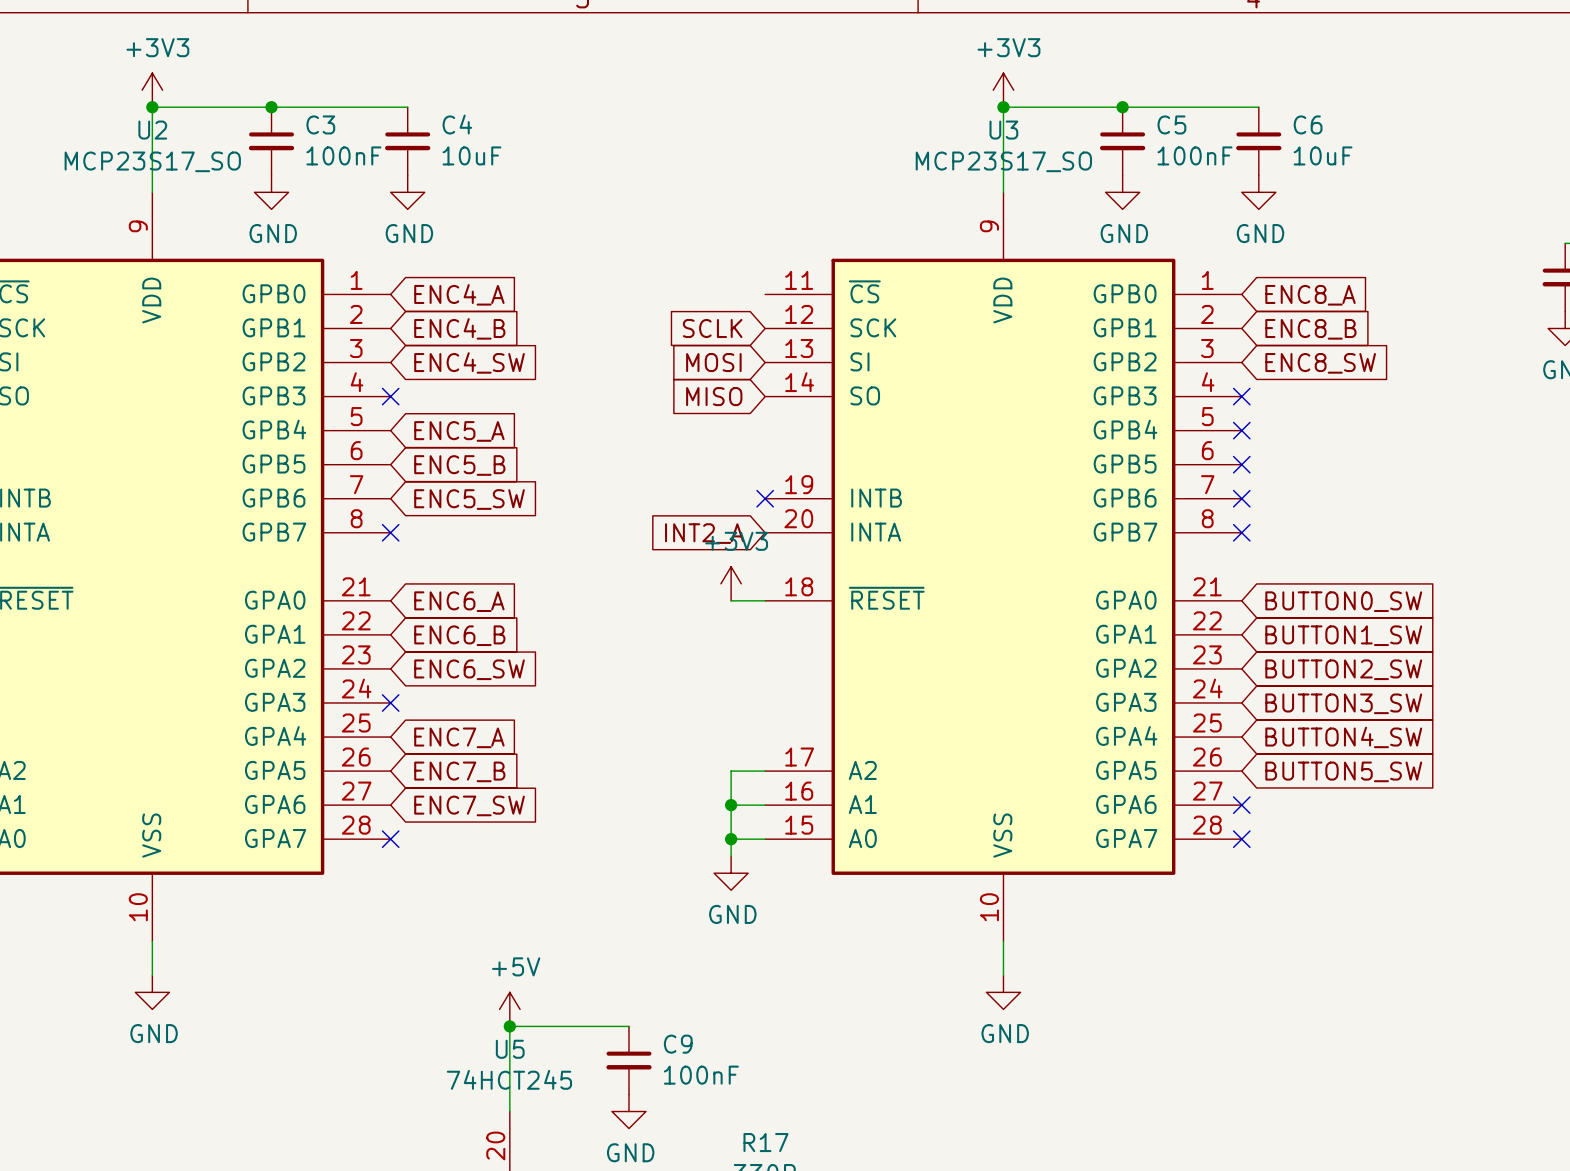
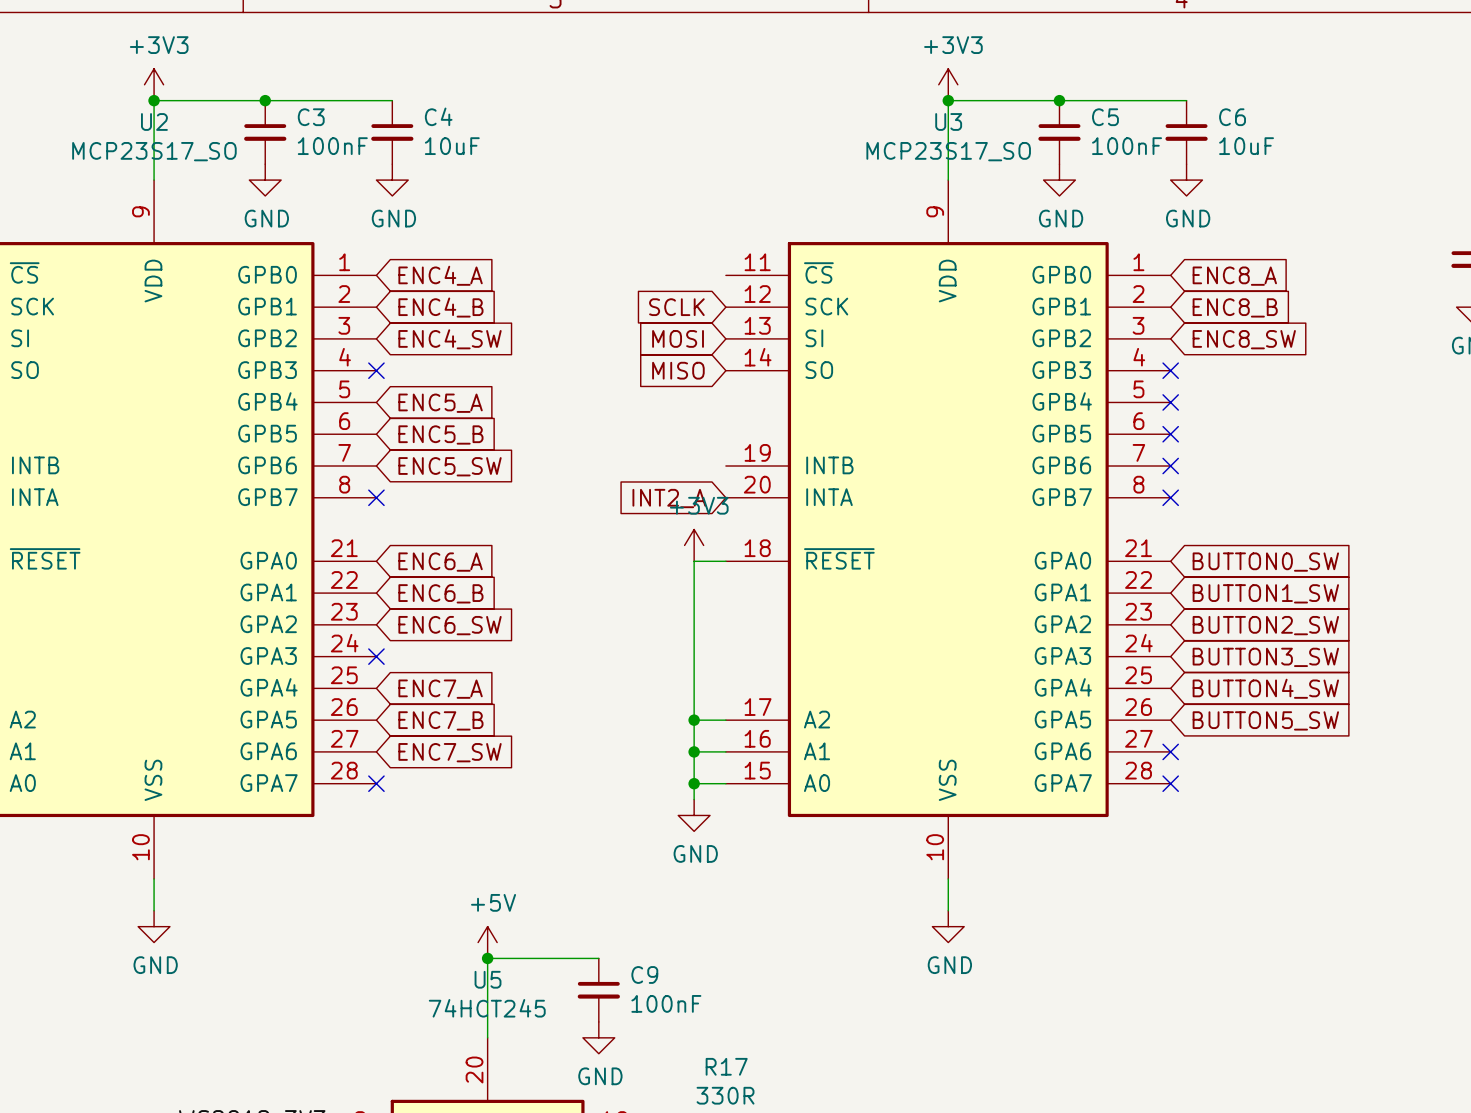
no-connect mark: (765, 498) -> none
wire: none -> (694, 561) (694, 720)
junction: none -> (694, 720)

